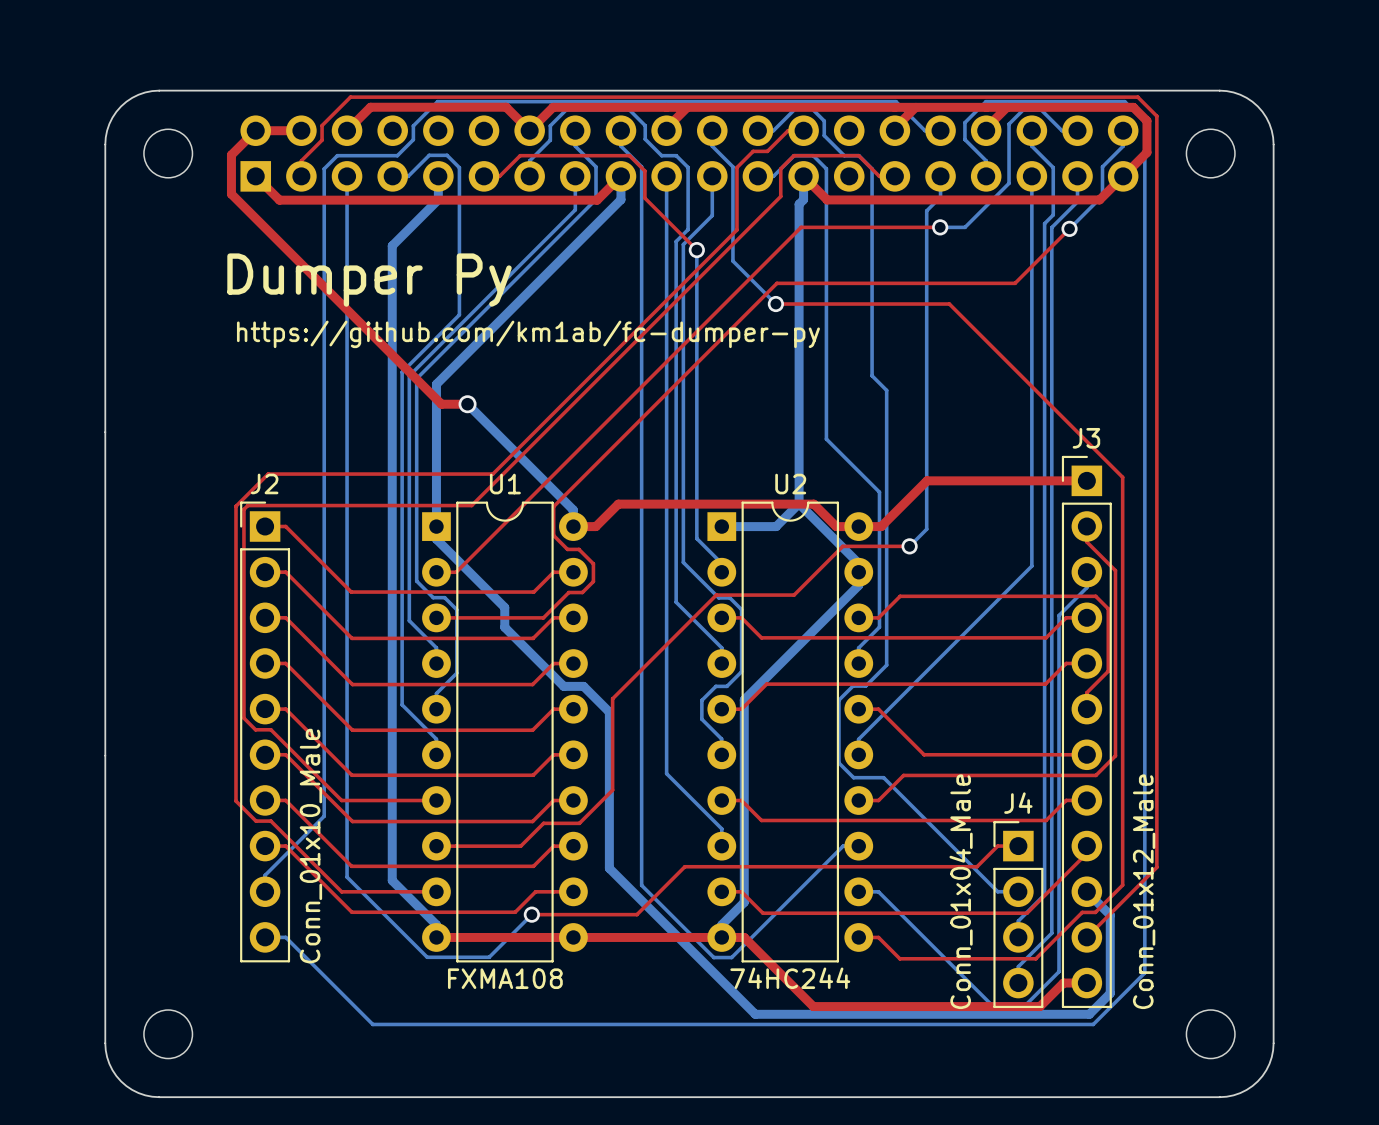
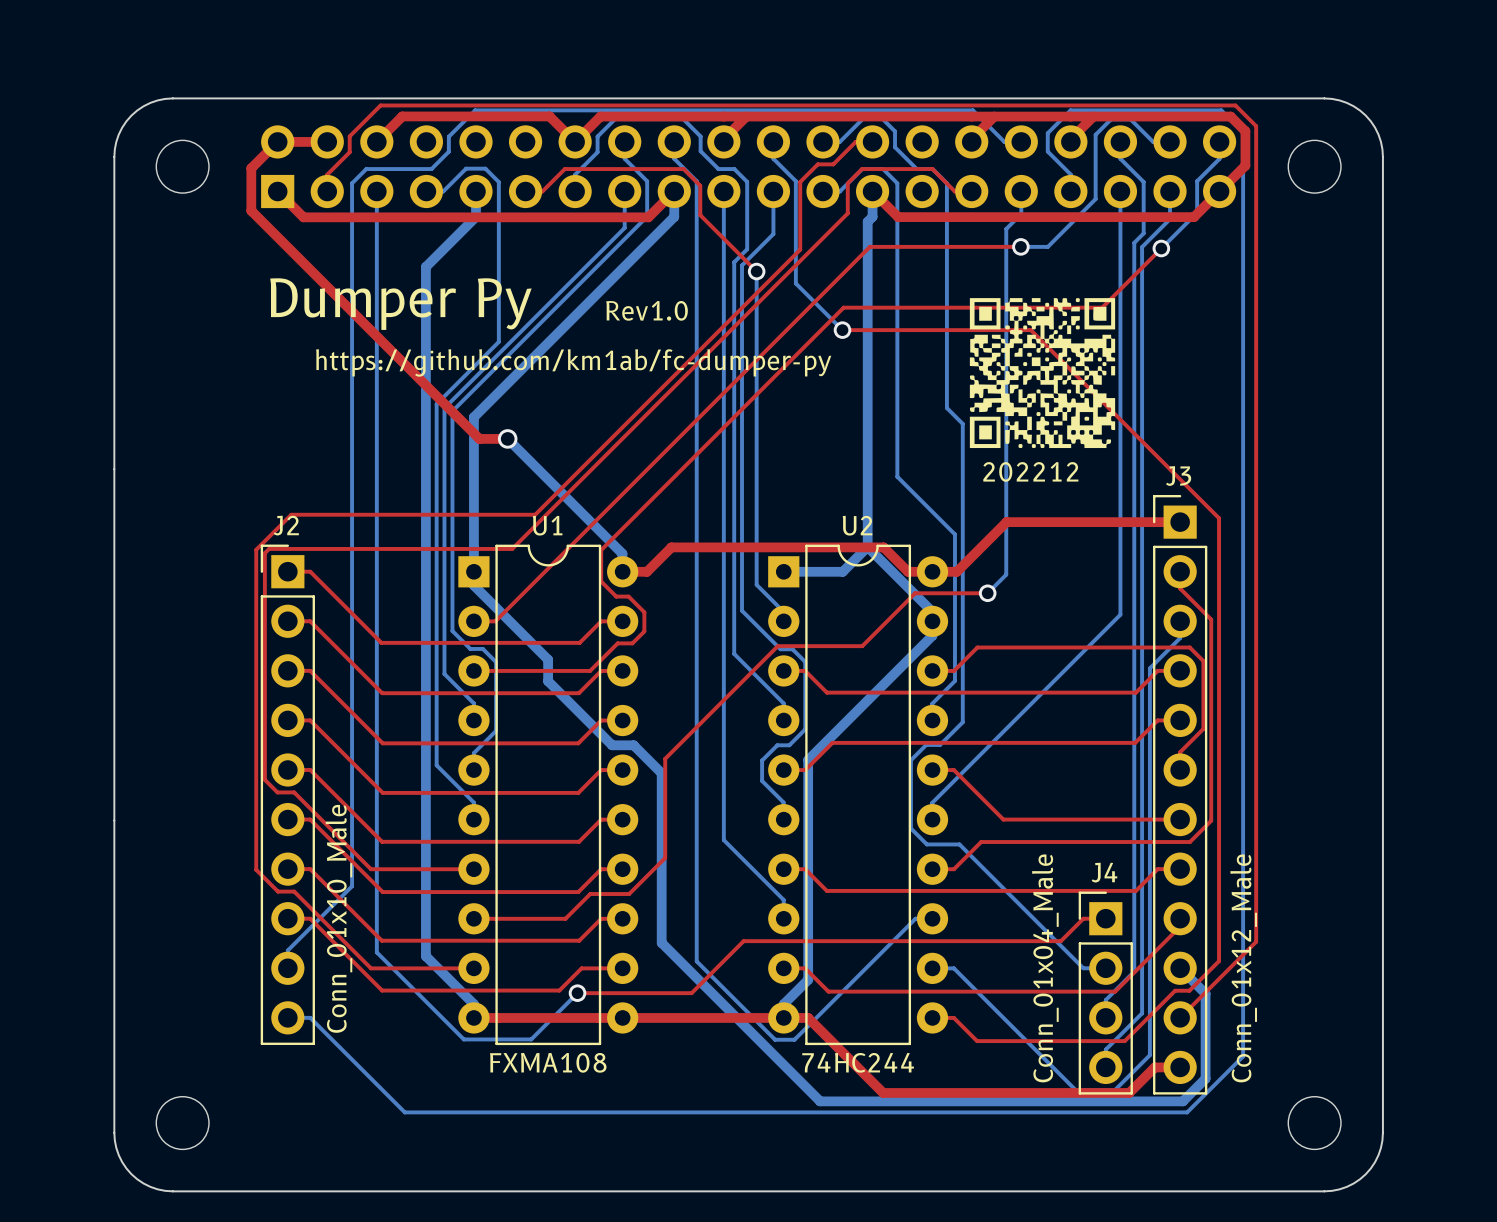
drawing: none -> [969, 298, 1116, 449]
text: none -> Rev1.0 (647, 310)
text: none -> 202212 (1030, 471)

